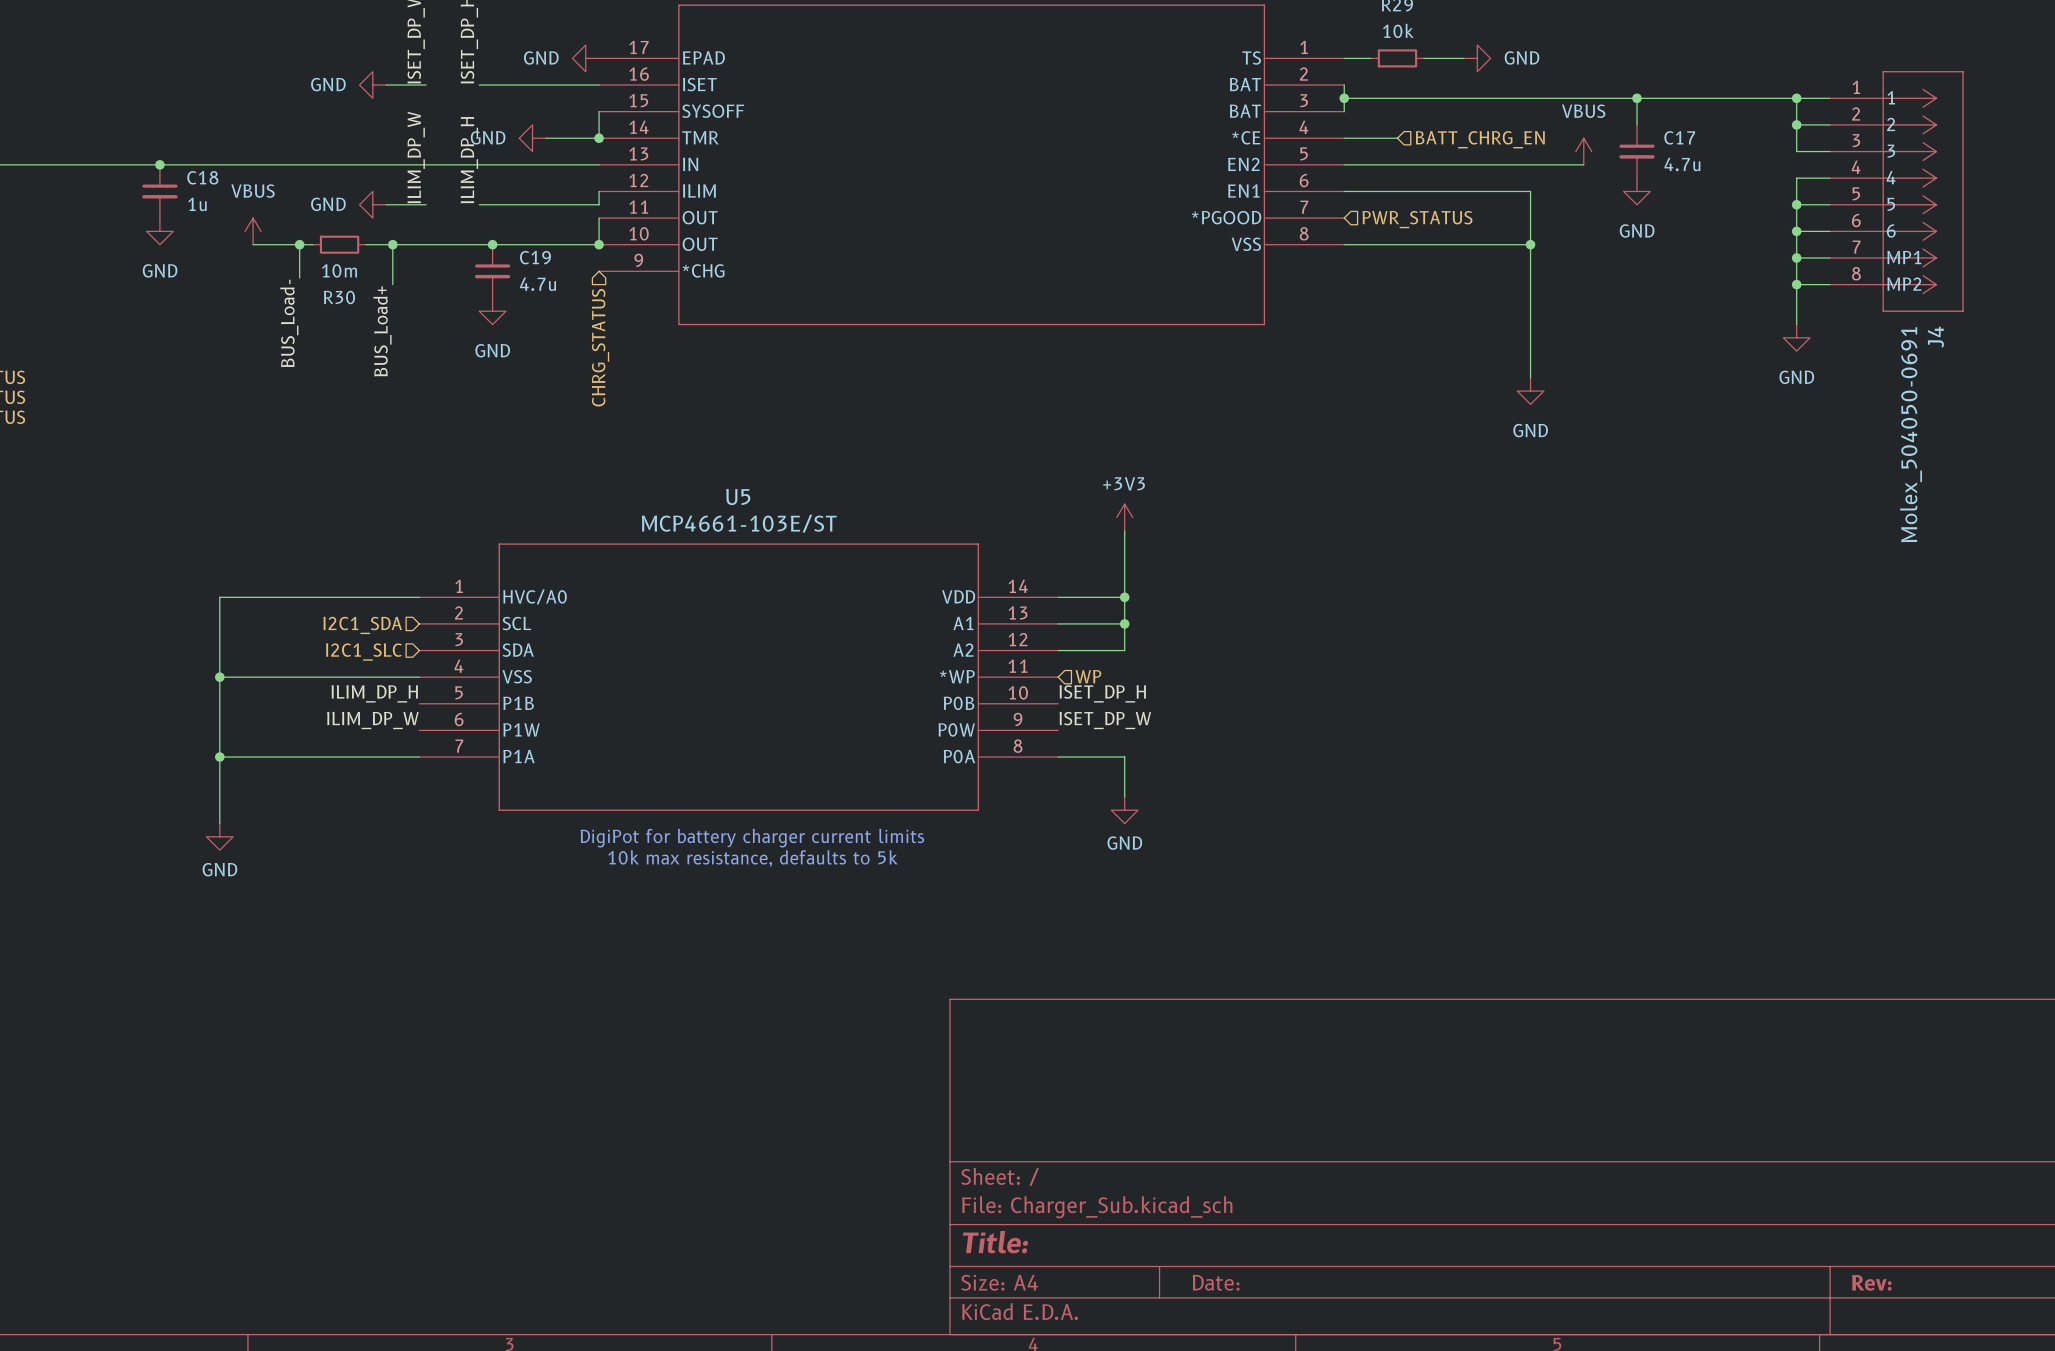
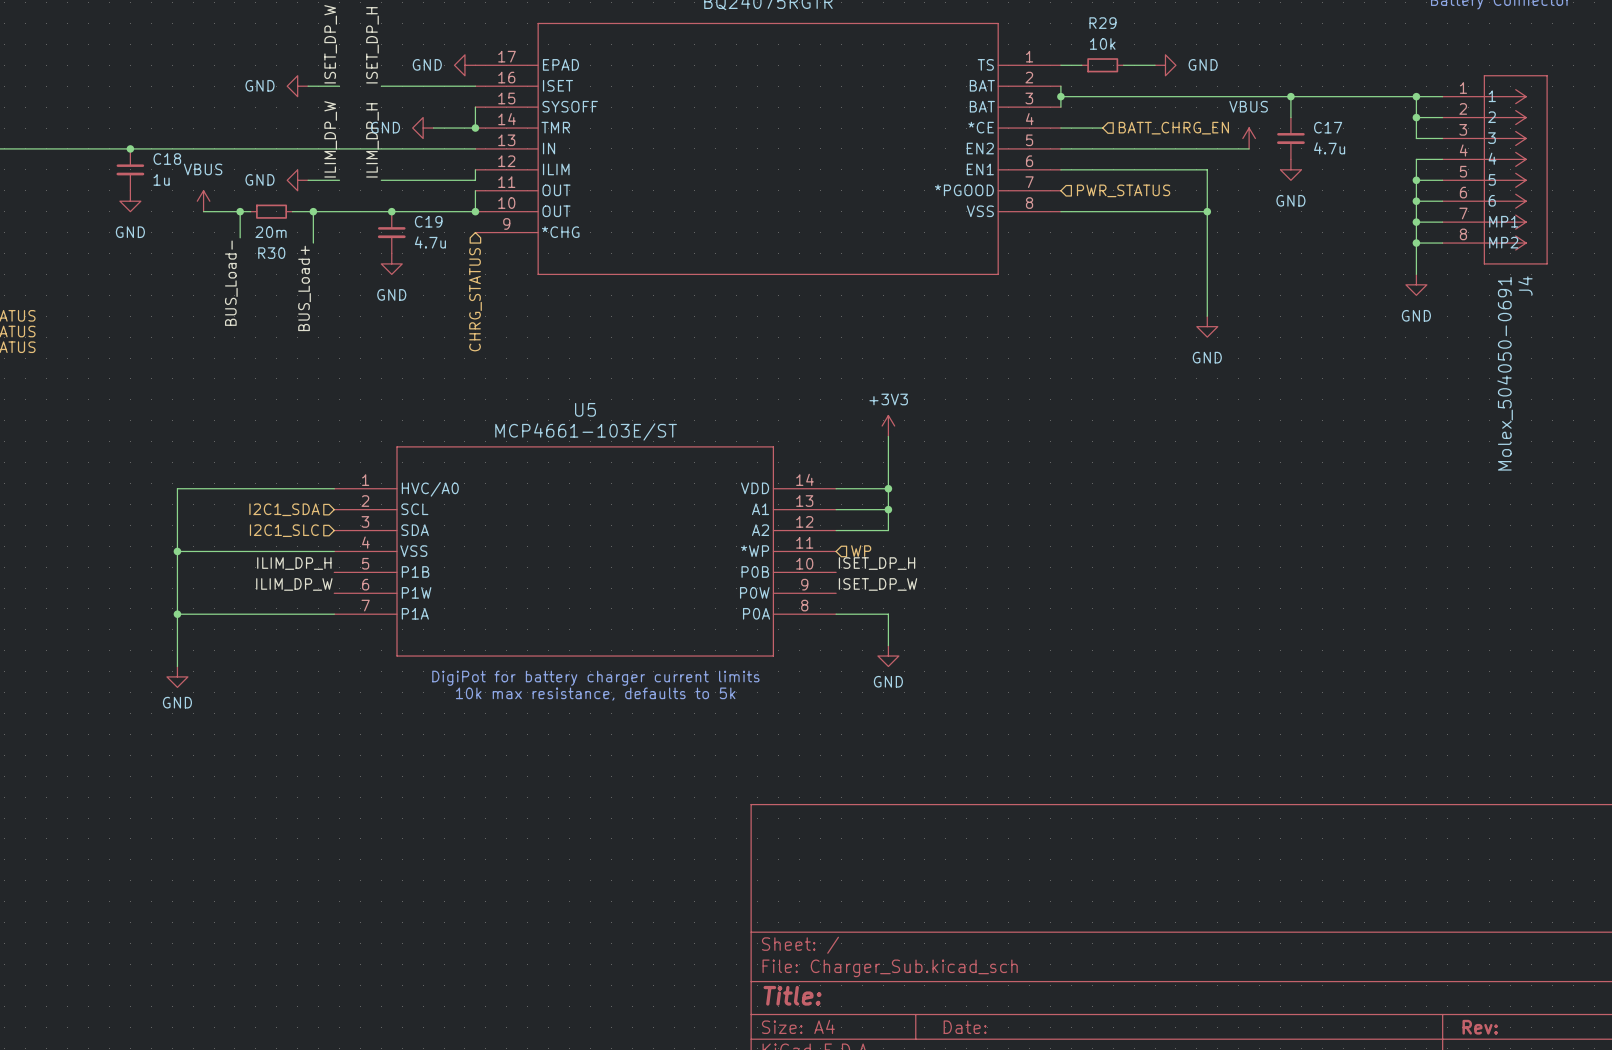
R30 value: 10m (339, 270) -> 20m (271, 232)

